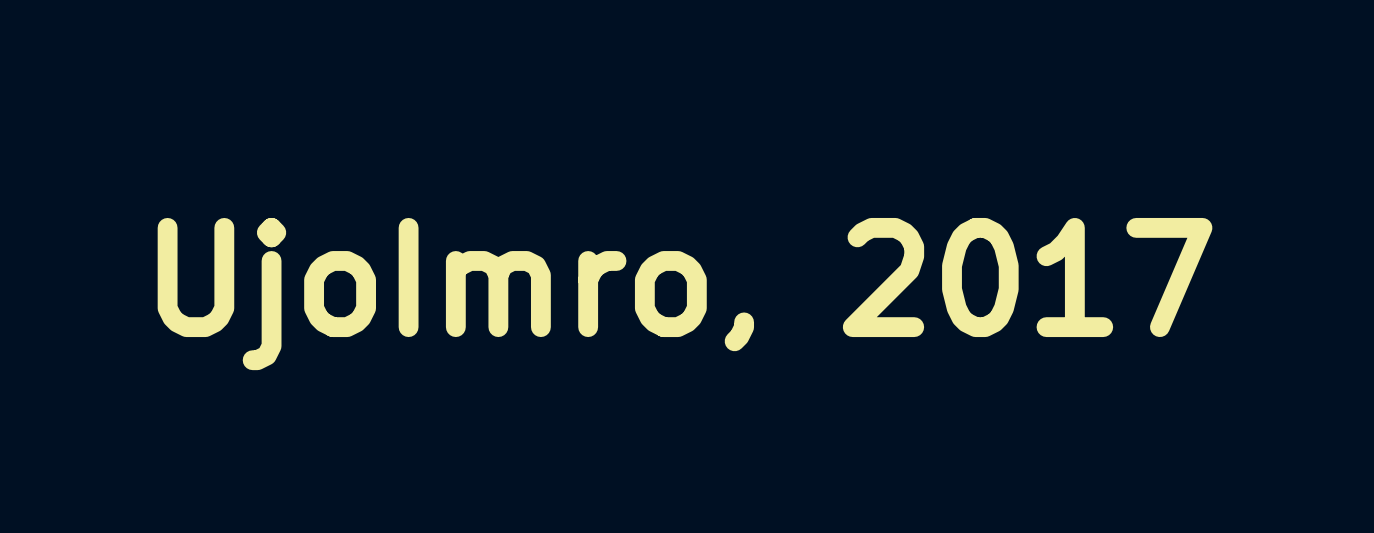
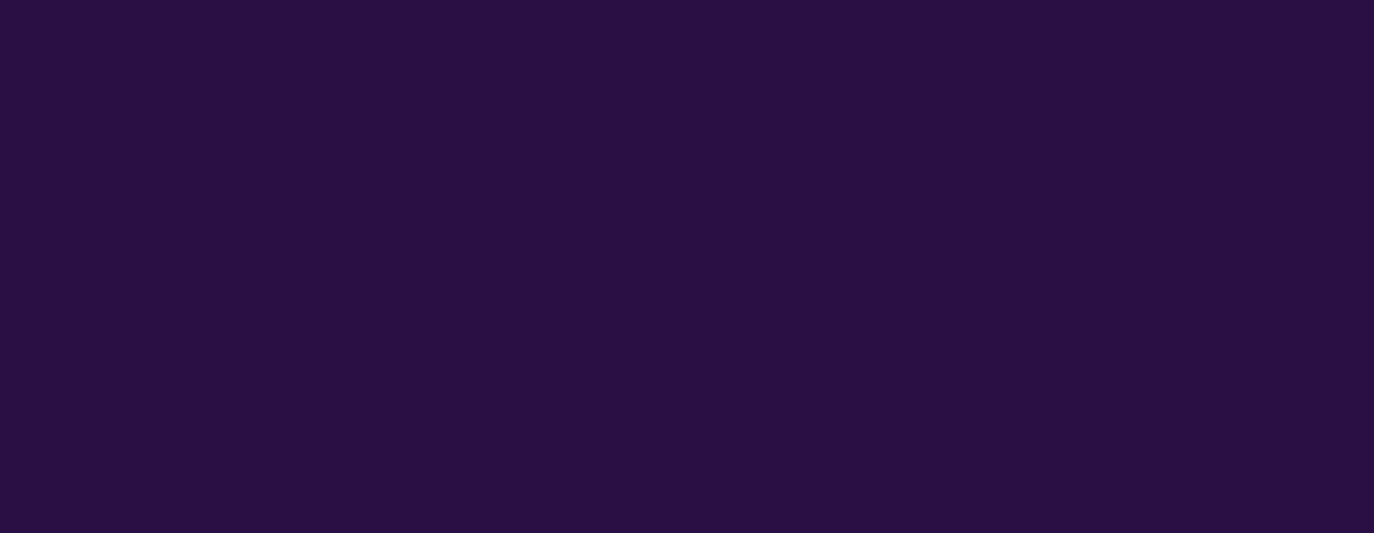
text: UjoImro, 2017 (685, 294) -> none

